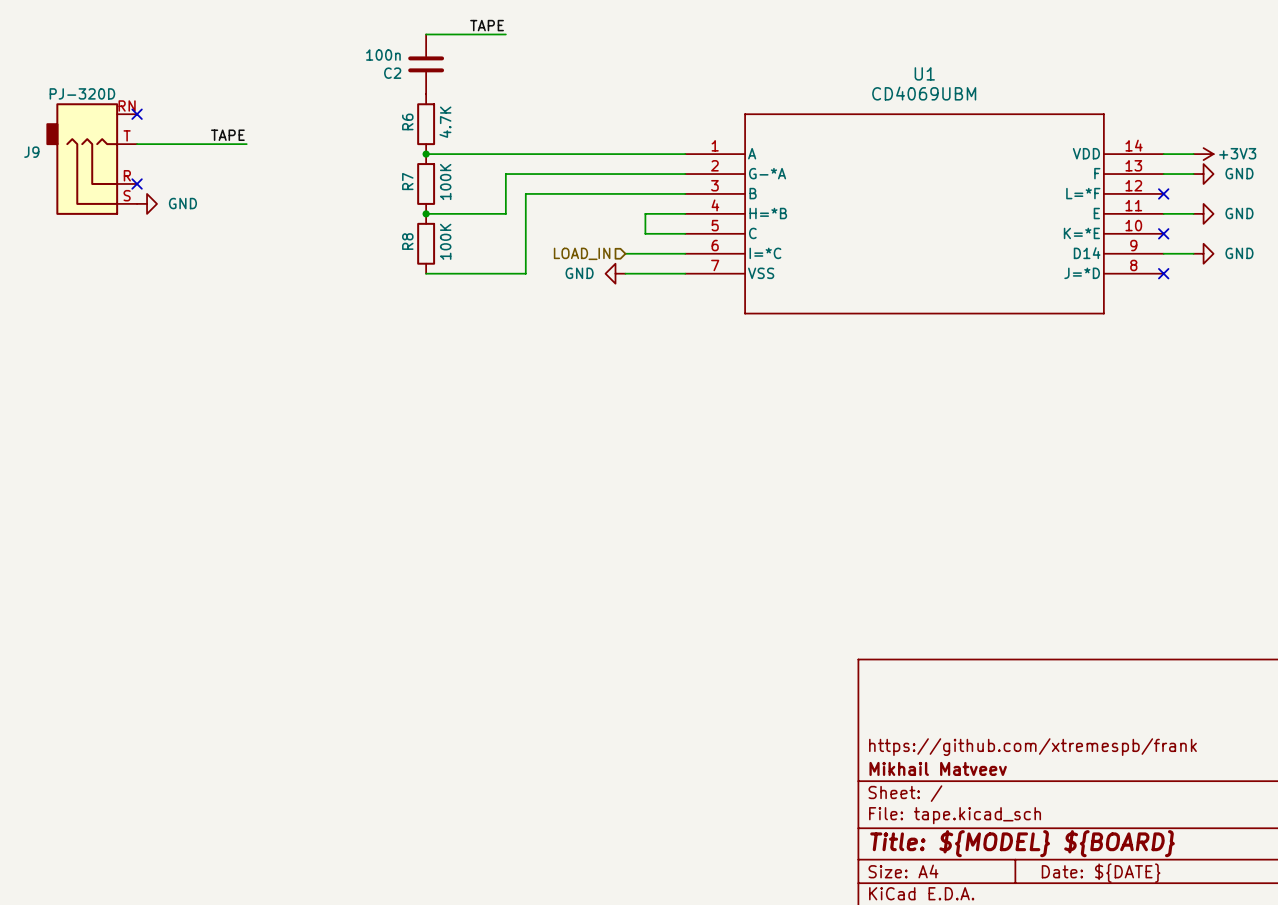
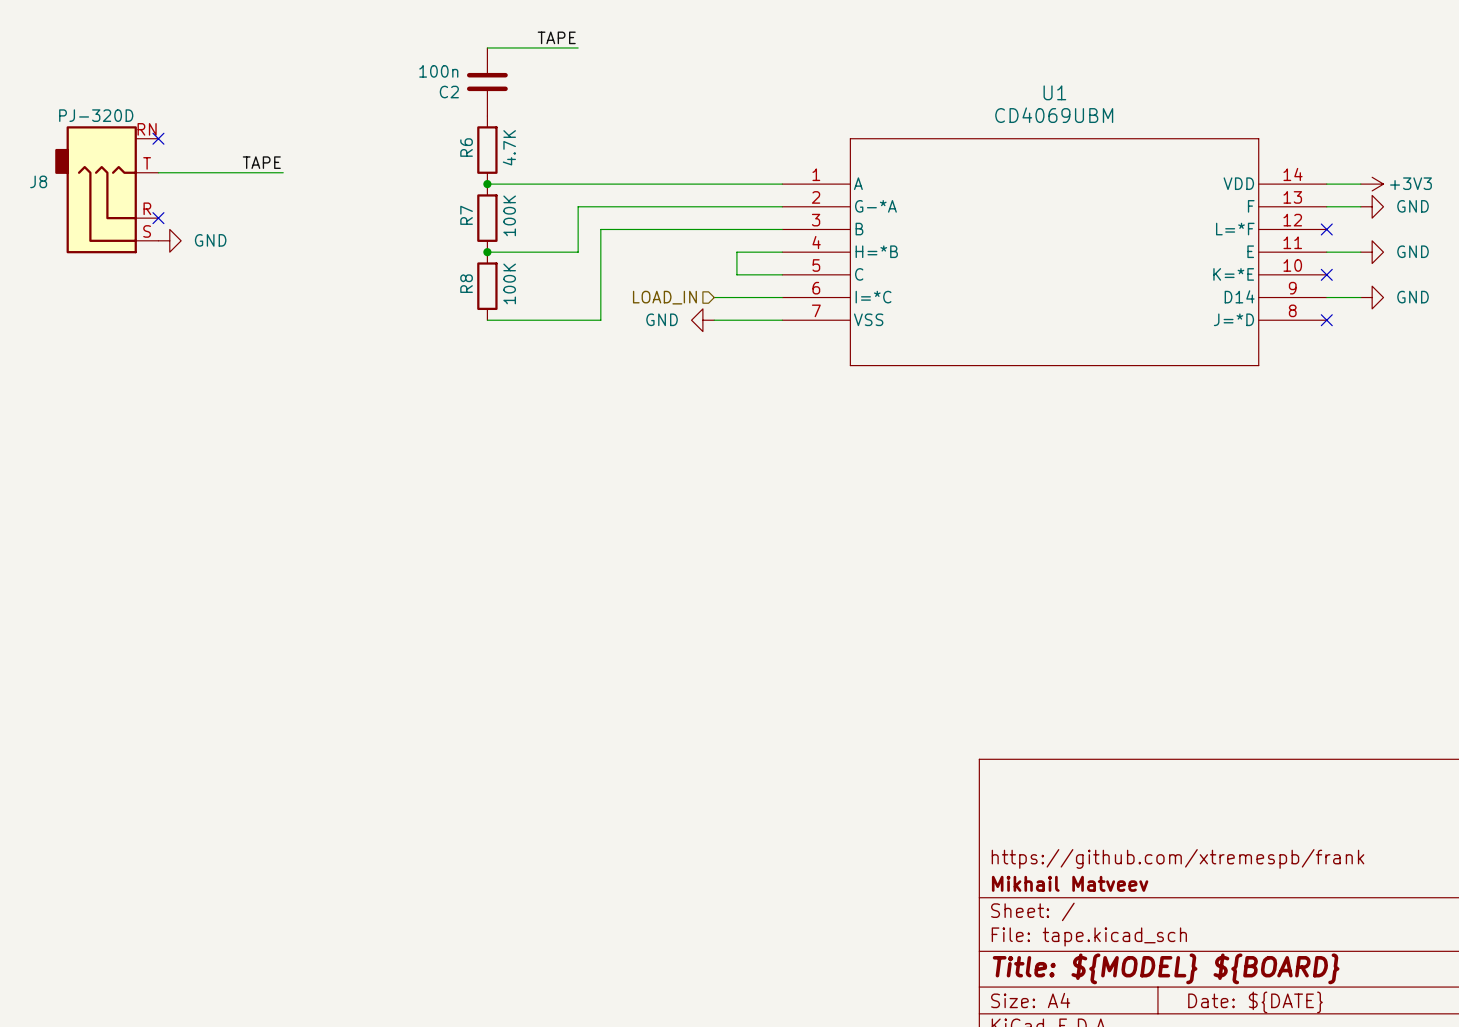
J9 name: J9 (31, 152) -> J8 (38, 181)

